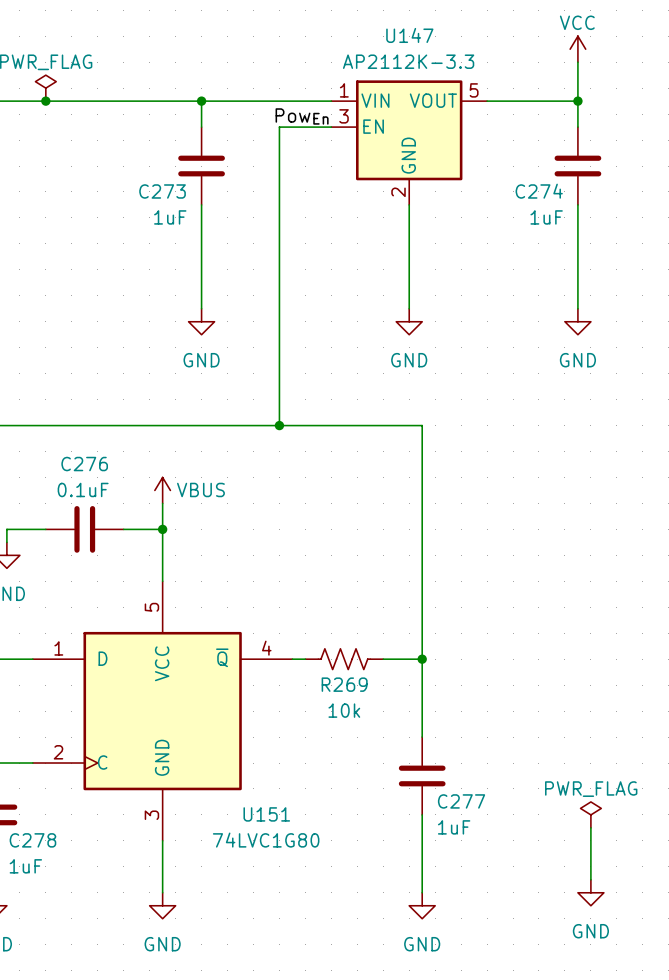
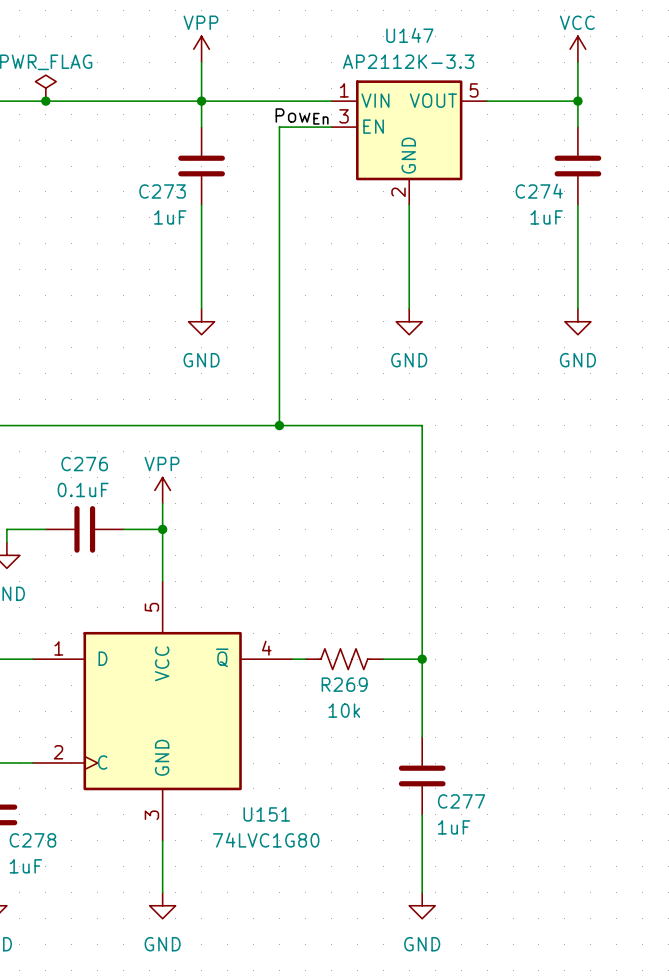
power symbol: none -> VPP (201, 49)
wire: none -> (201, 62) (201, 101)
power symbol: VBUS (162, 490) -> VPP (162, 490)
power symbol: PWR_FLAG (590, 814) -> none
wire: (590, 827) (590, 879) -> none
power symbol: GND (590, 892) -> none

